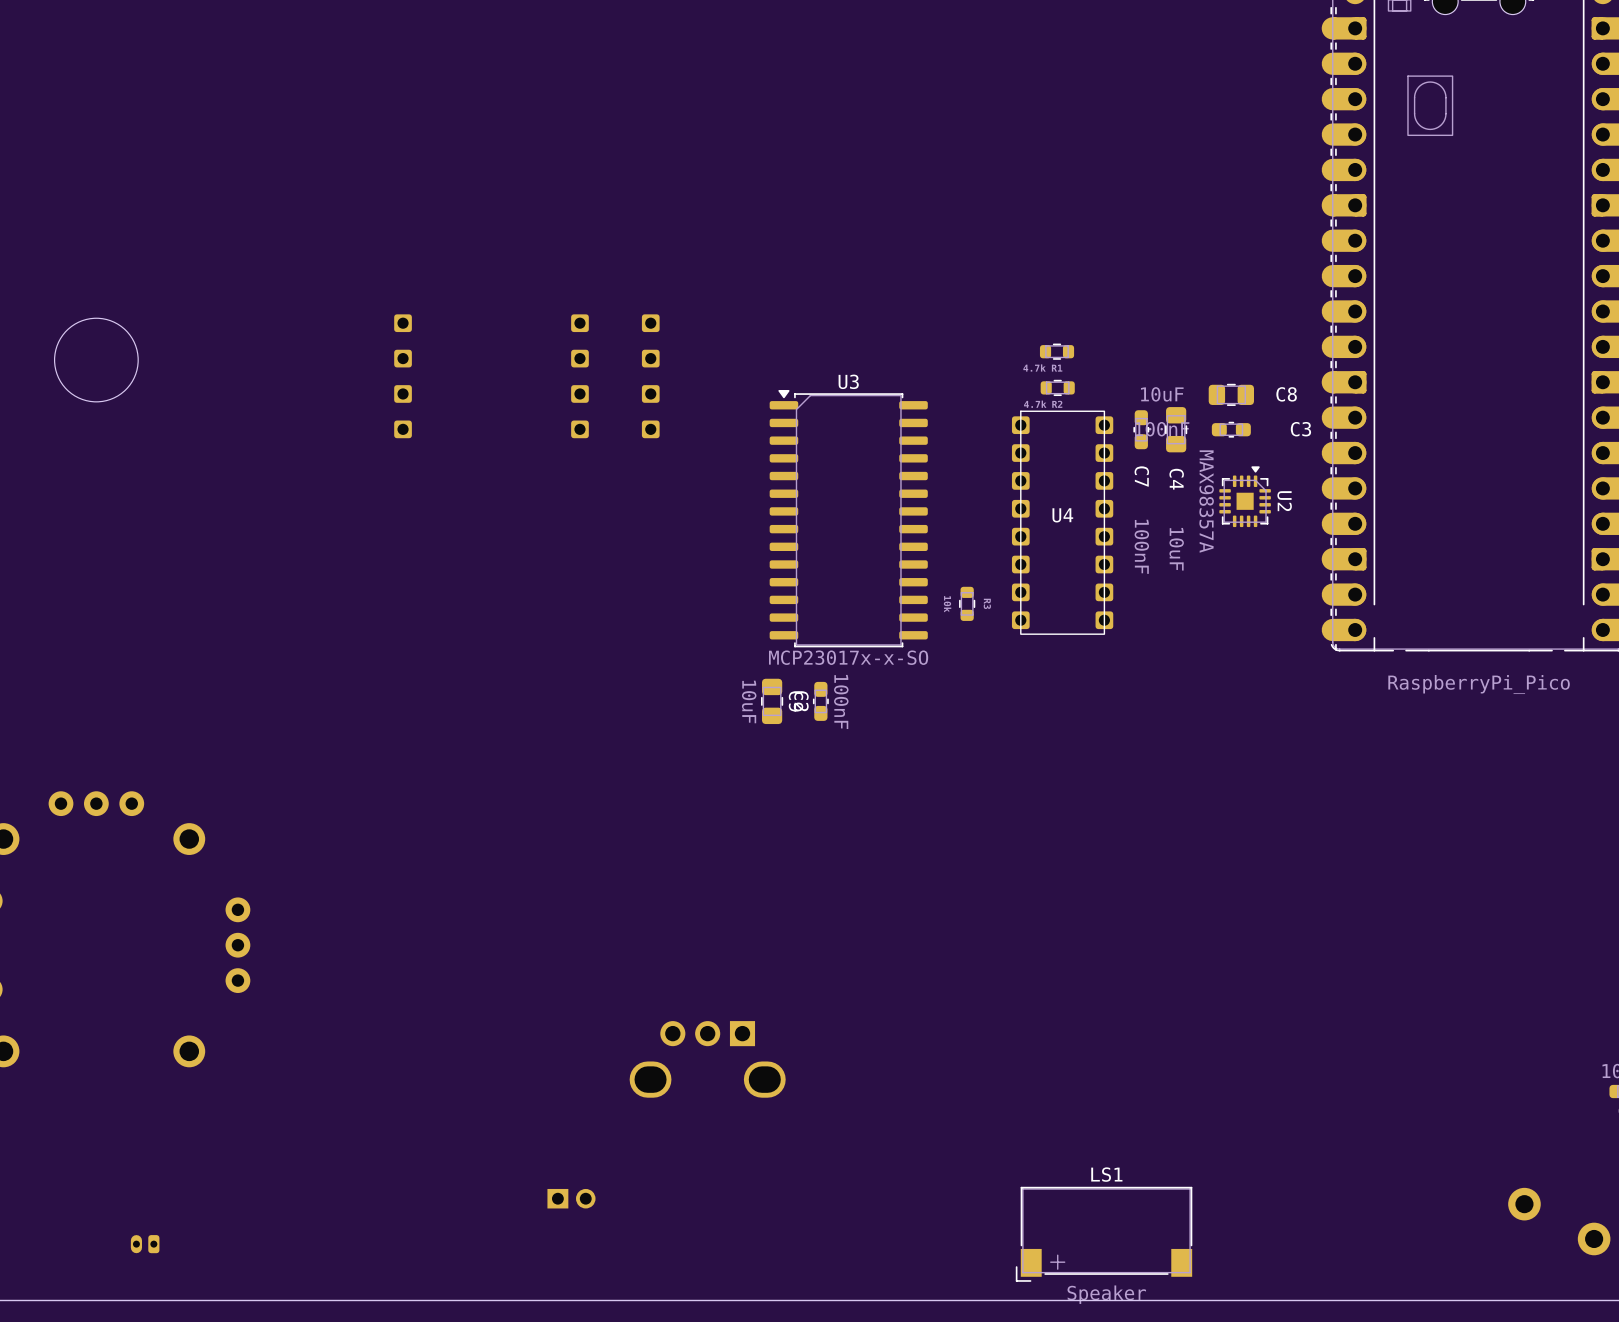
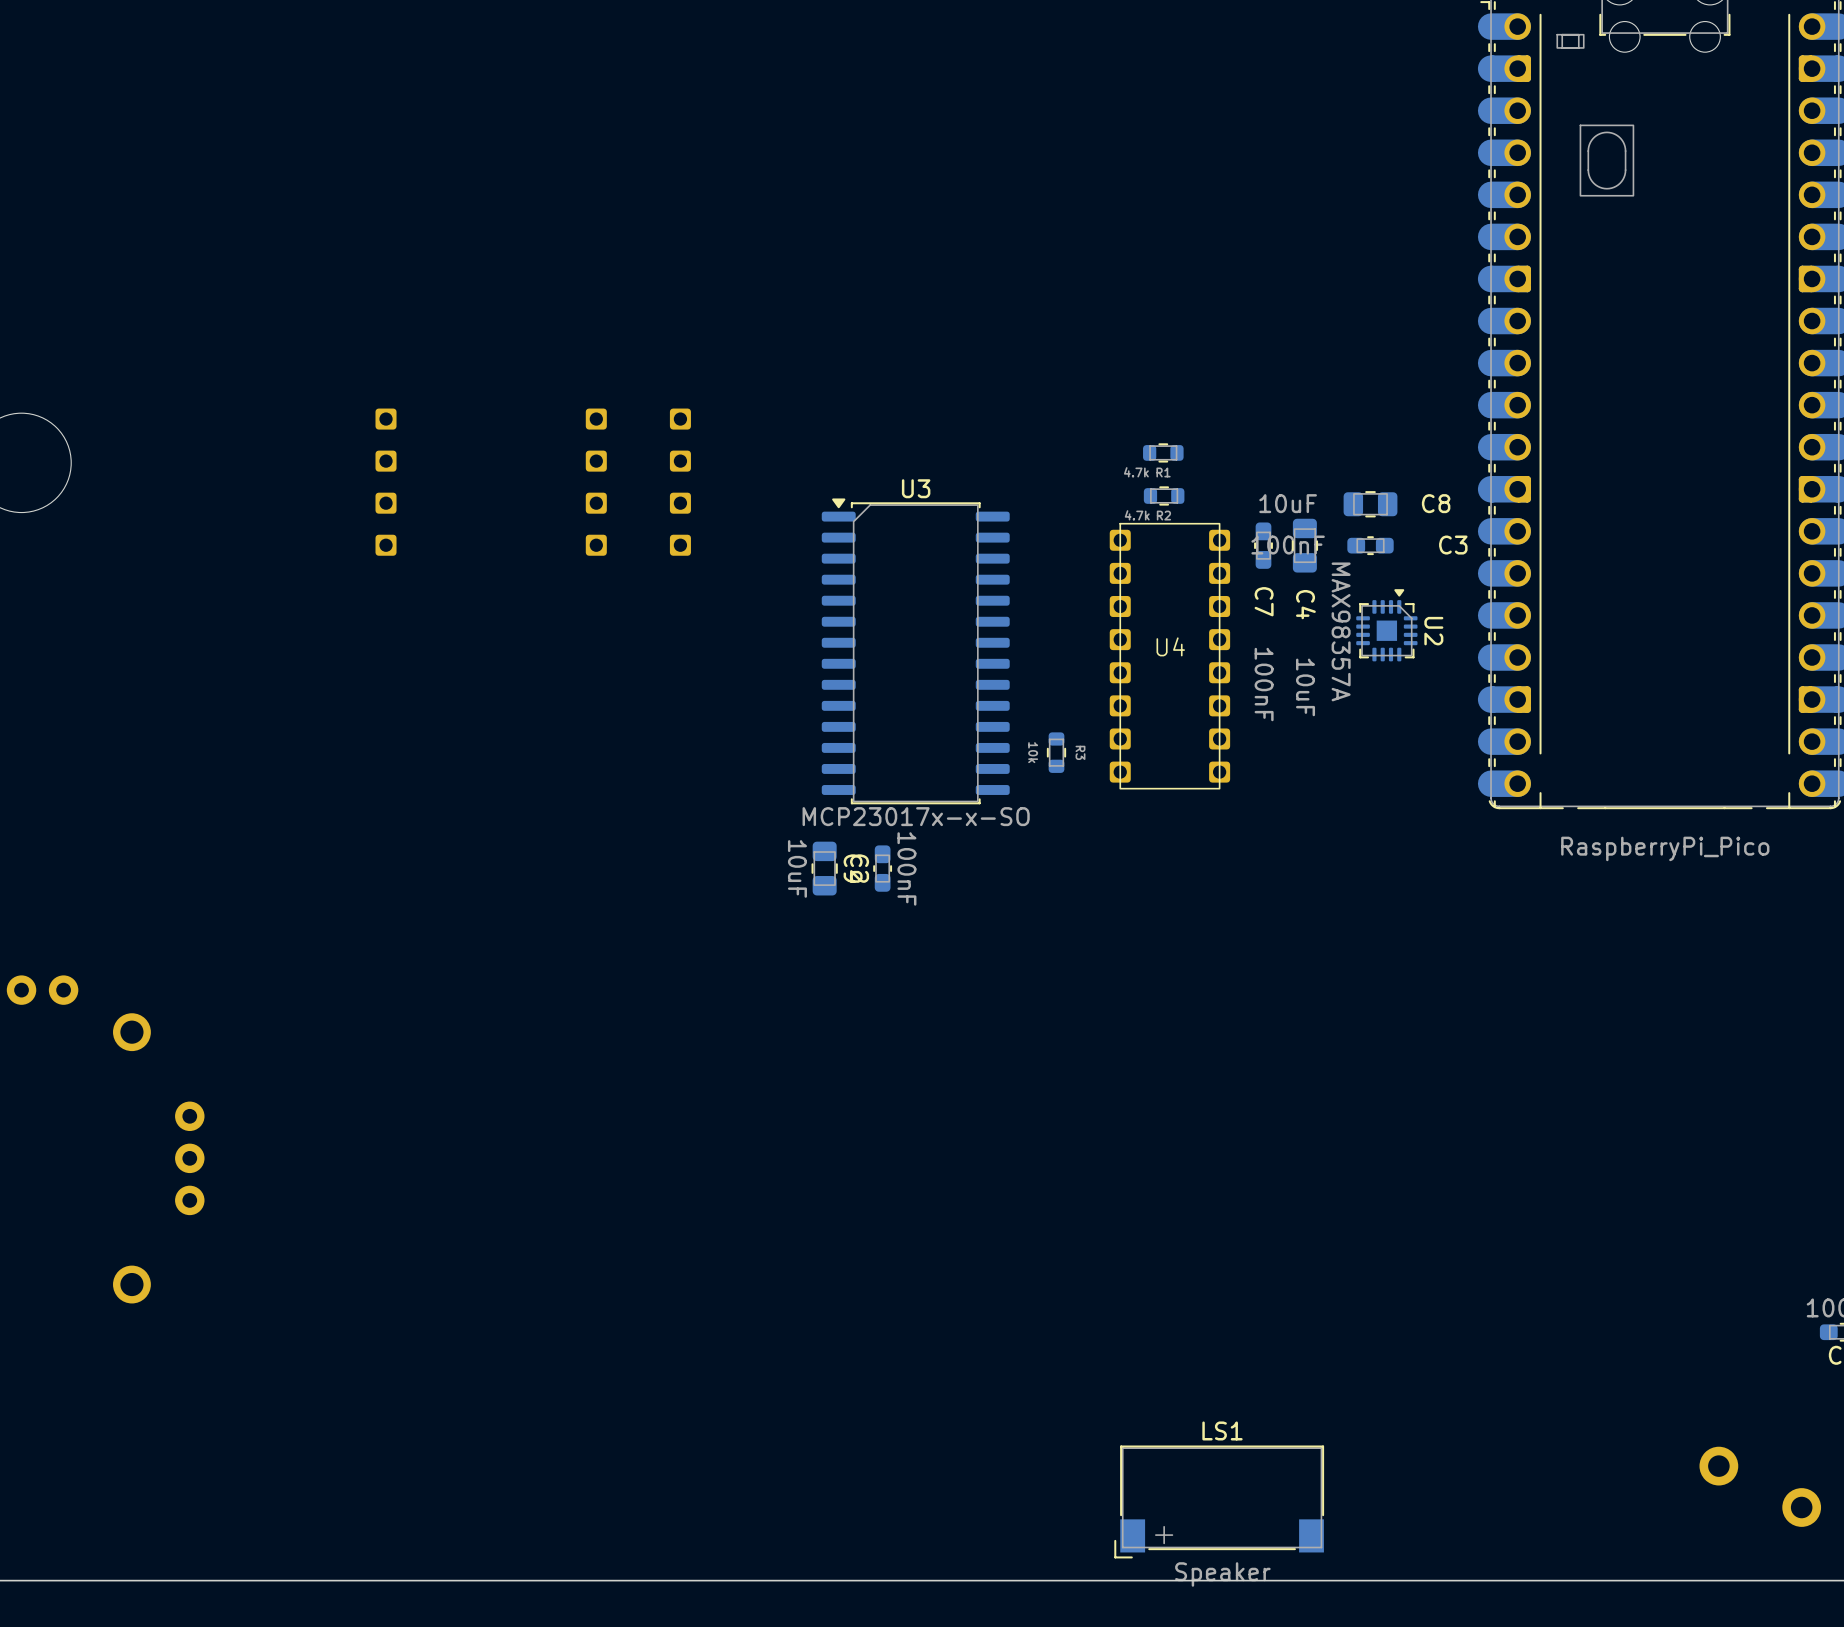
part: (707, 1059) -> none
part: (571, 1198) -> none
part: (145, 1244) -> none

